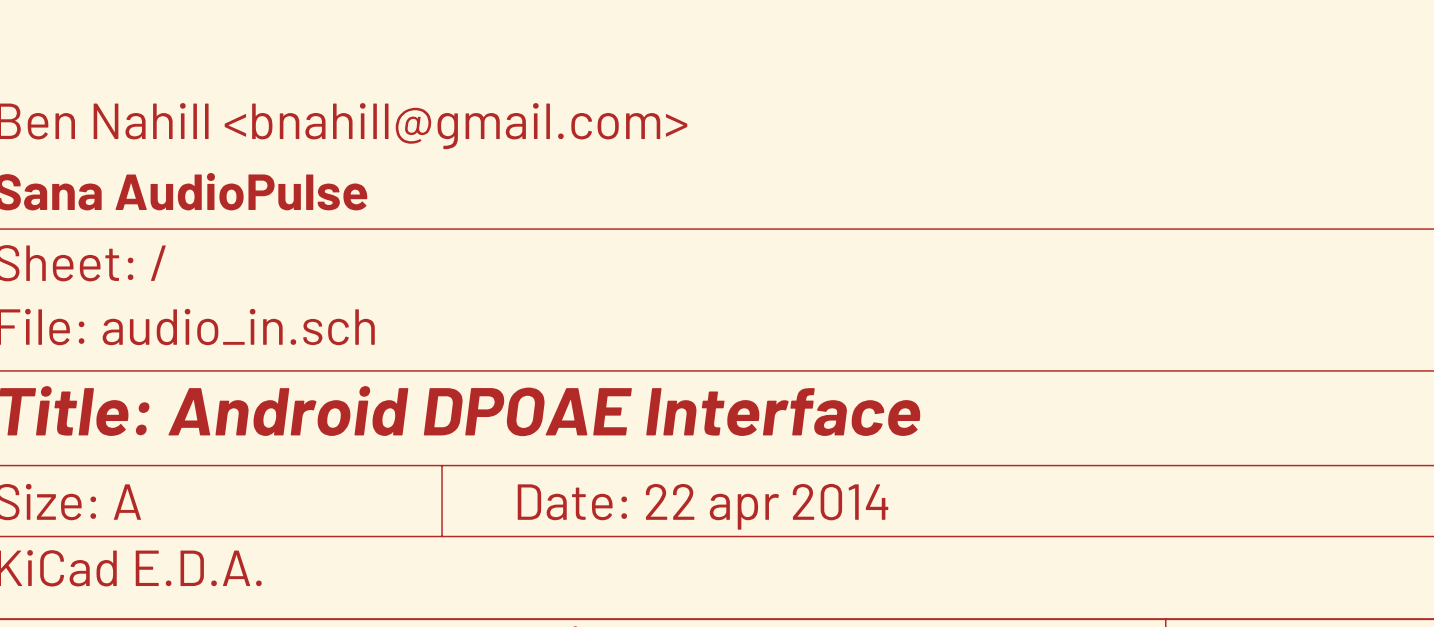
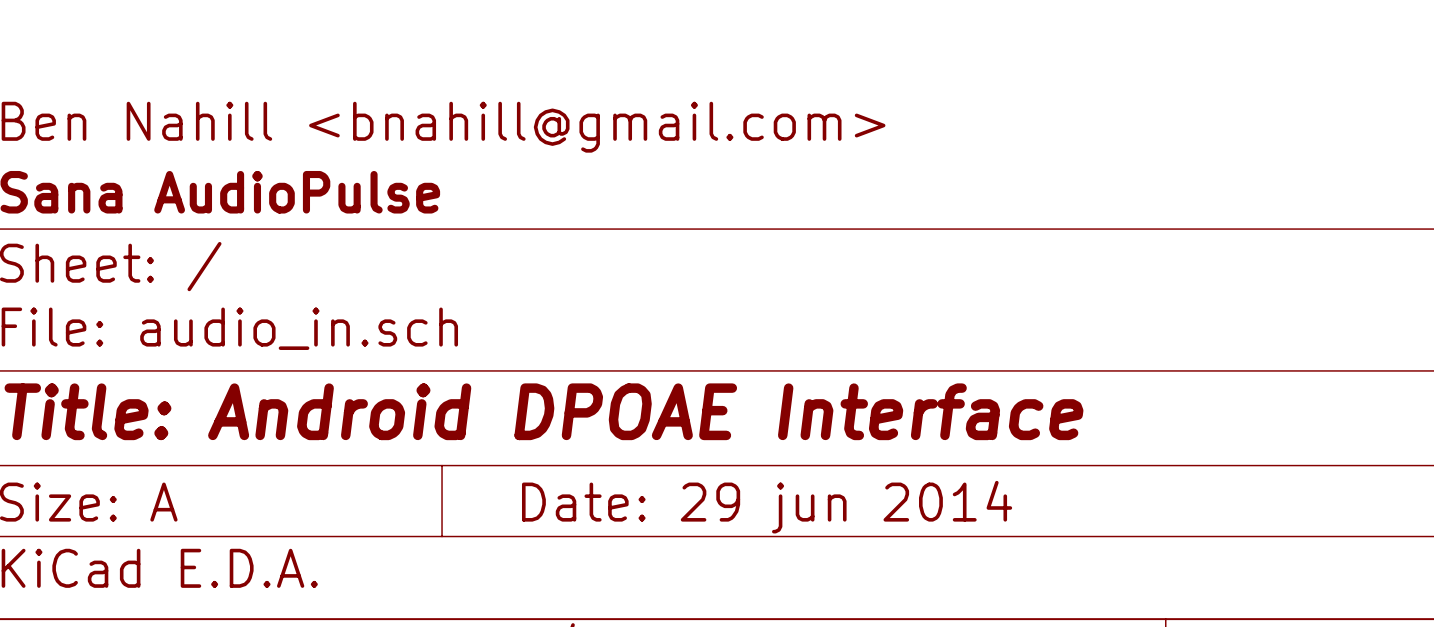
title block: Date: 22 apr 2014 (703, 506) -> Date: 29 jun 2014 (767, 507)

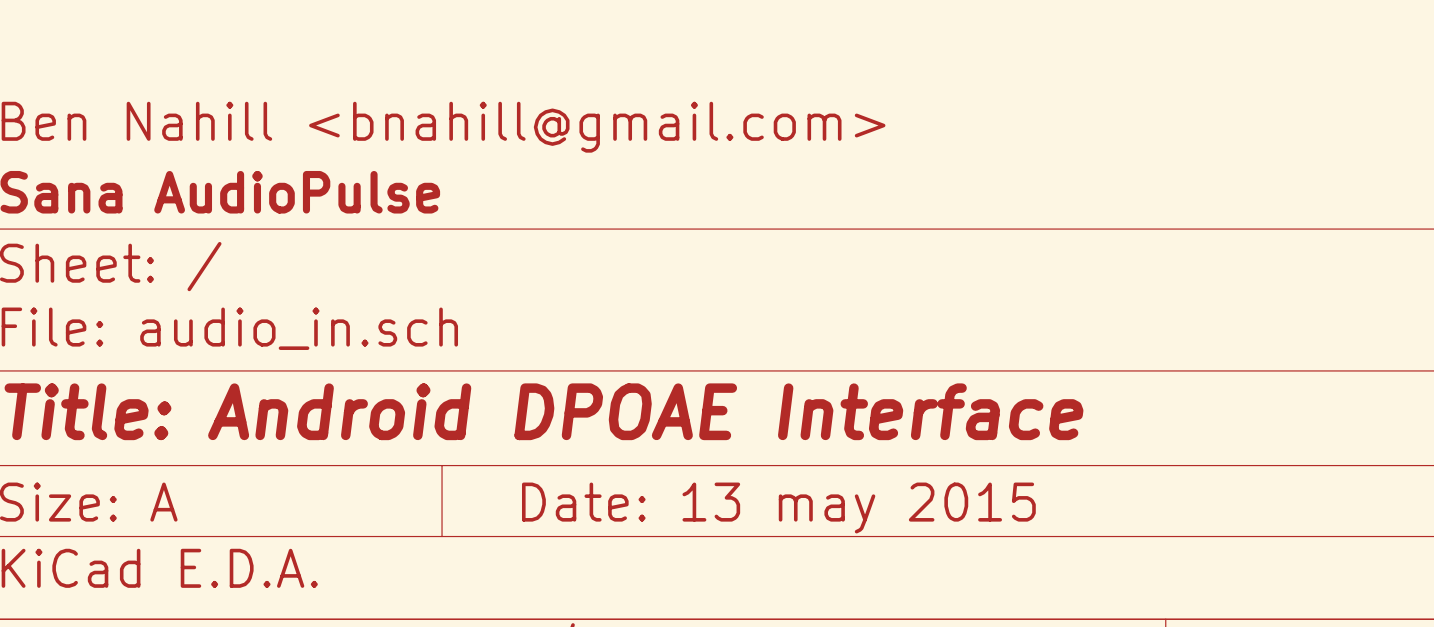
title block: Date: 29 jun 2014 (767, 507) -> Date: 13 may 2015 (778, 508)

